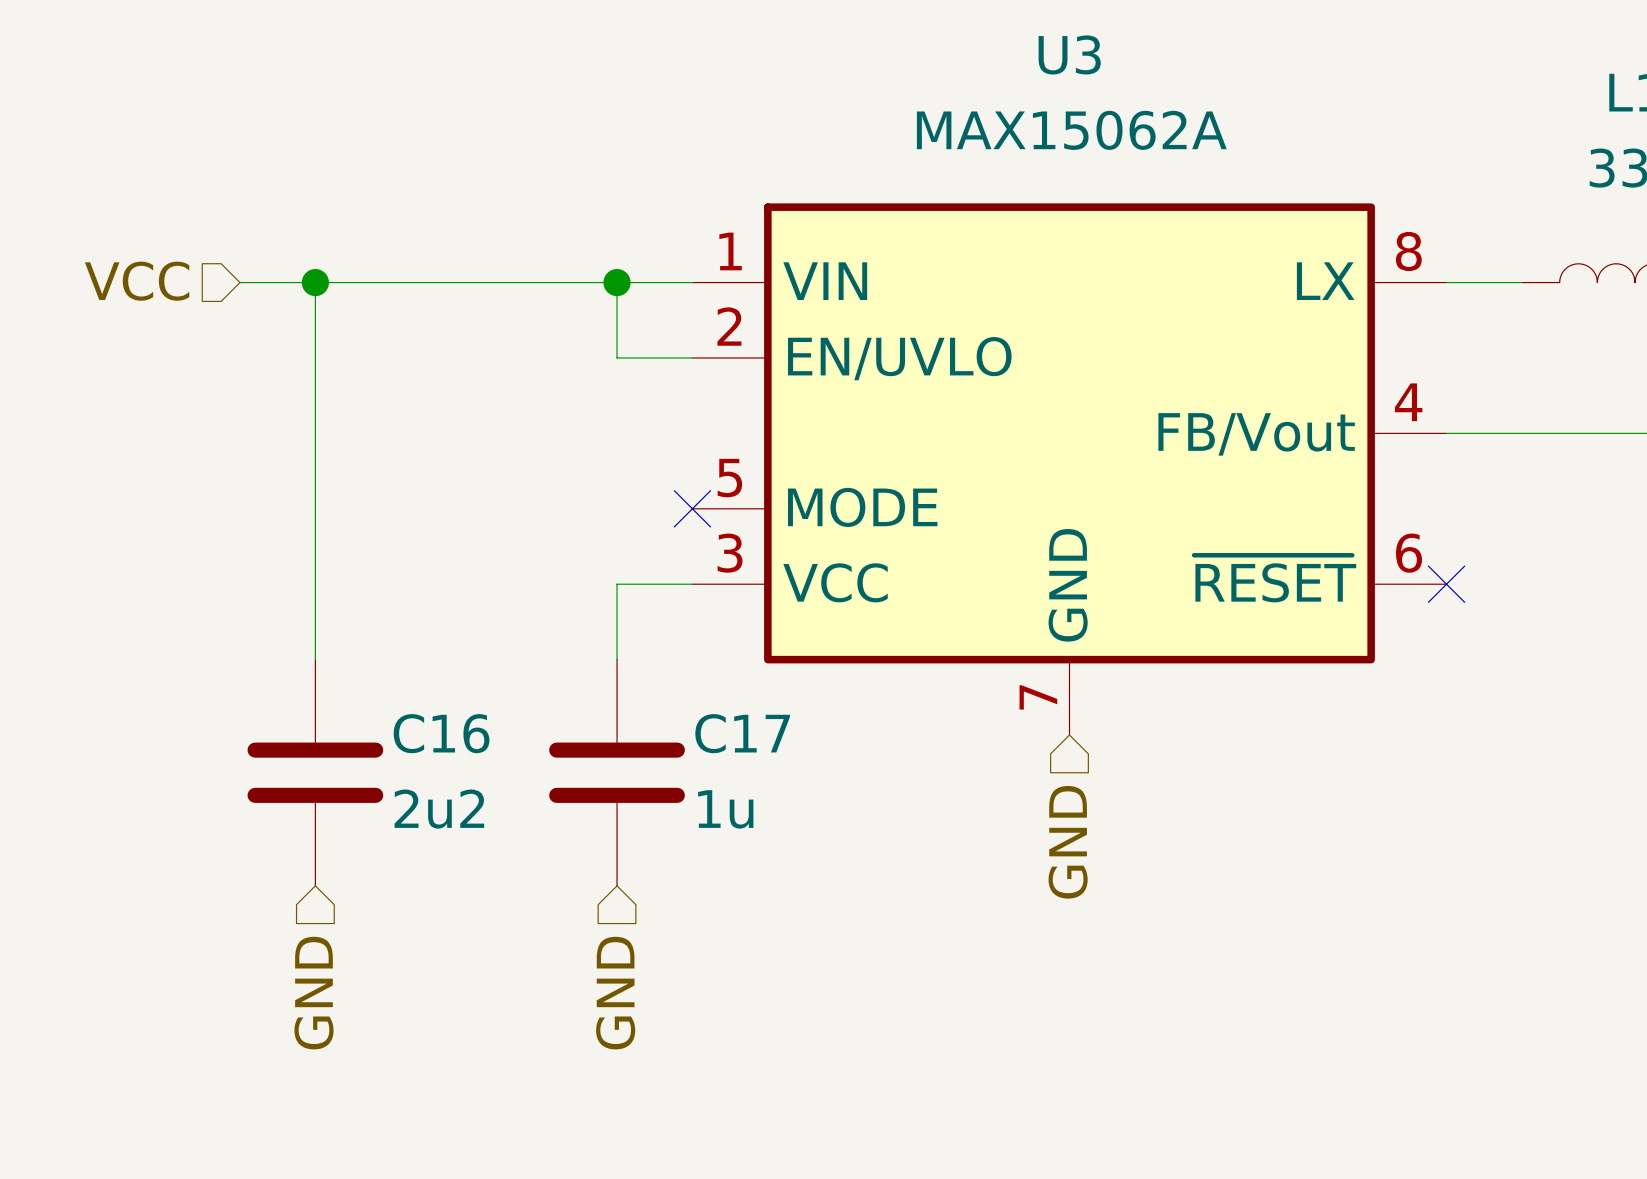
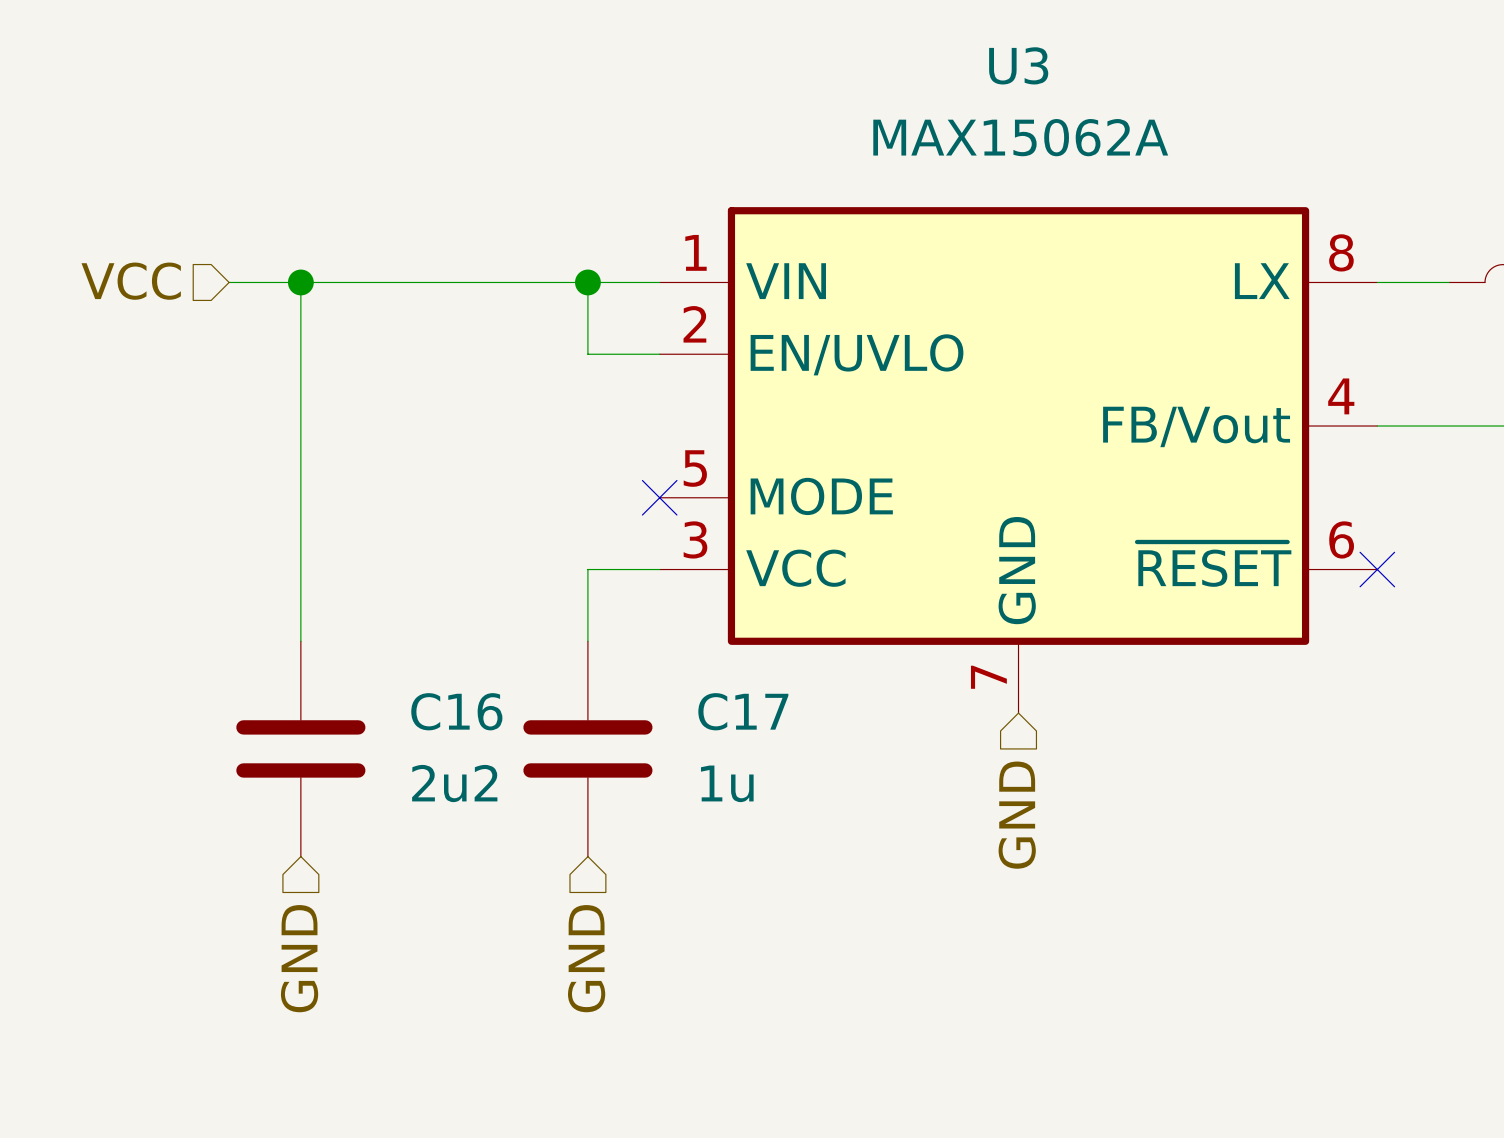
C16 name position: C16 (441, 733) -> C16 (456, 711)
C17 name position: C17 (742, 733) -> C17 (743, 711)
C16 value position: 2u2 (439, 809) -> 2u2 (454, 783)
C17 value position: 1u (725, 809) -> 1u (727, 783)

